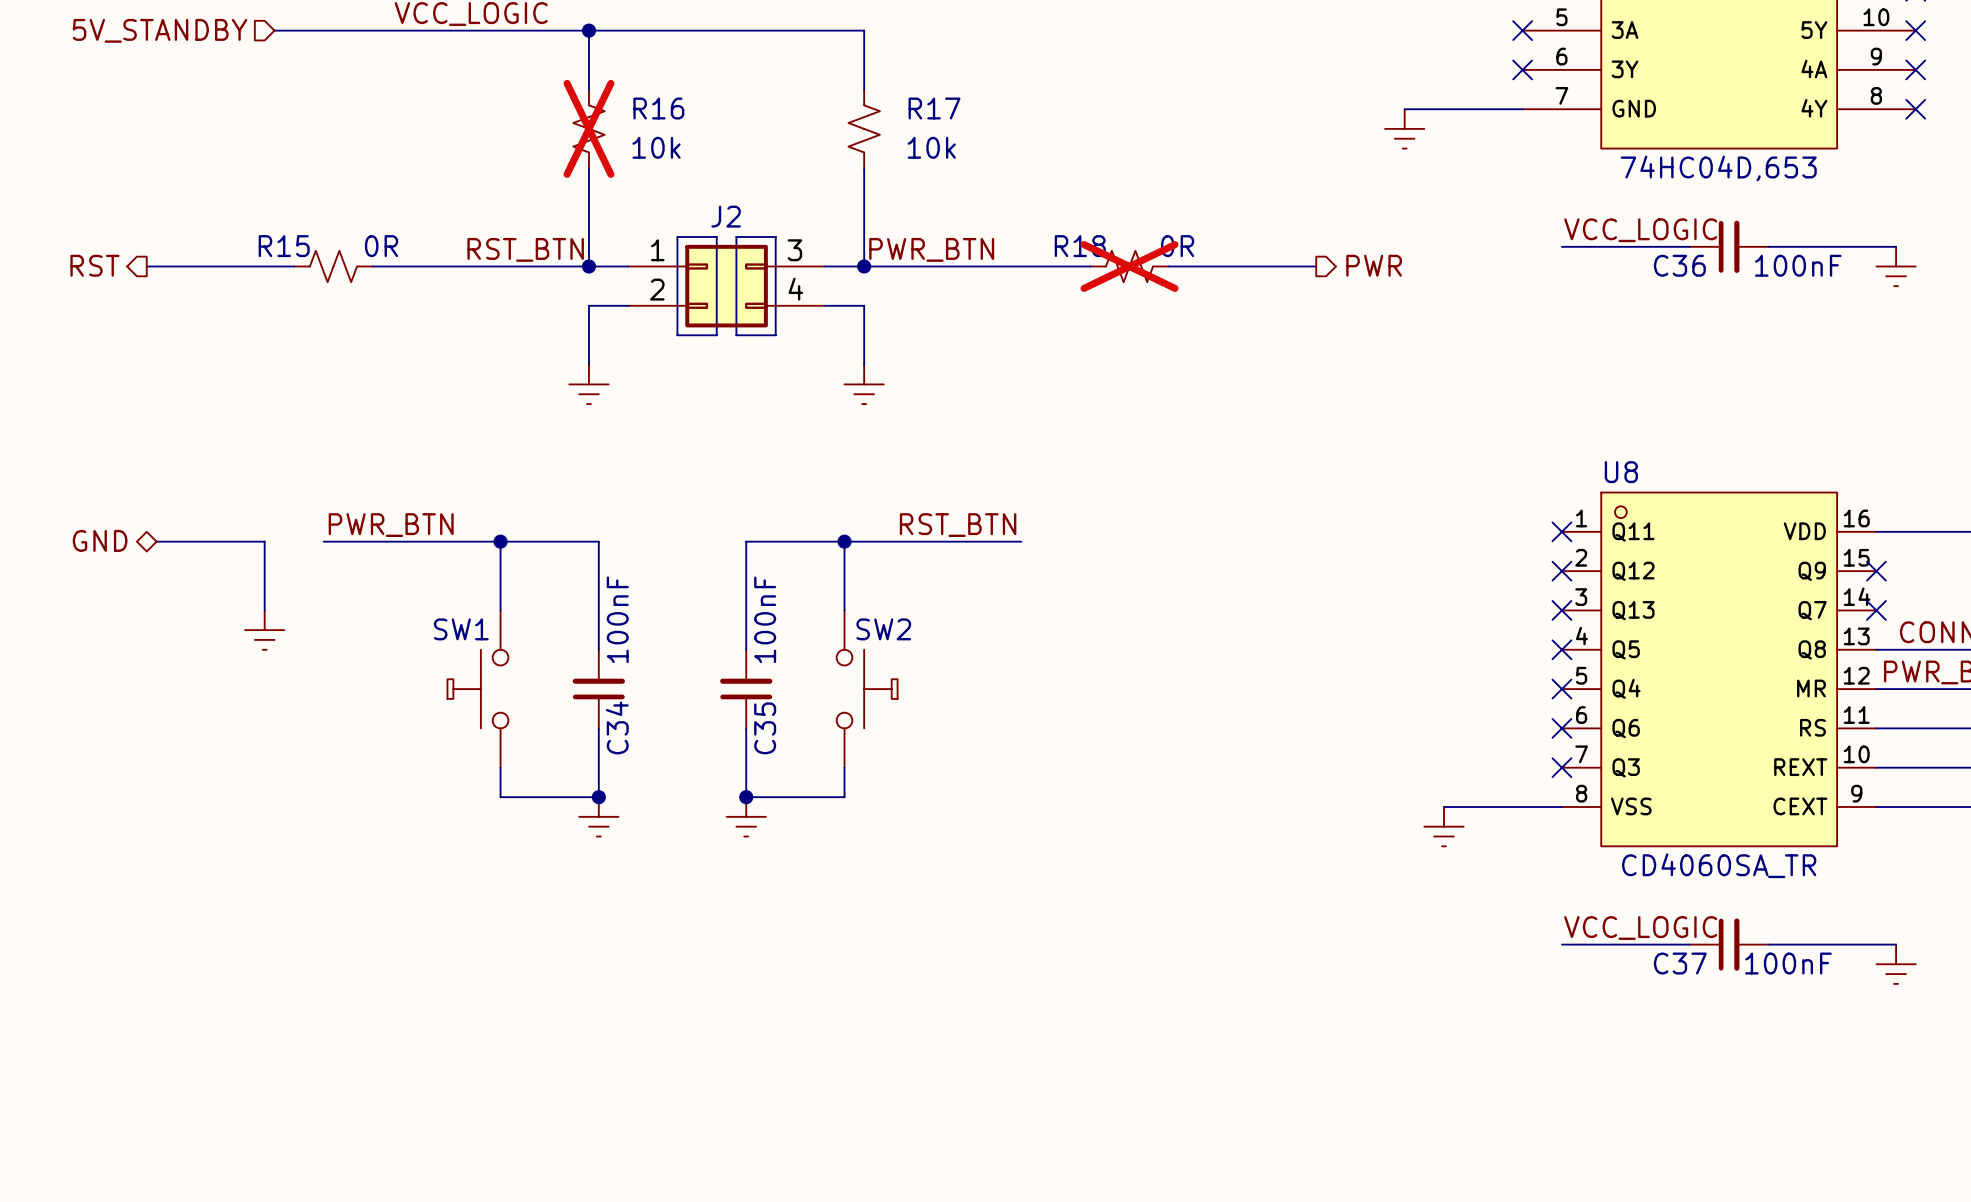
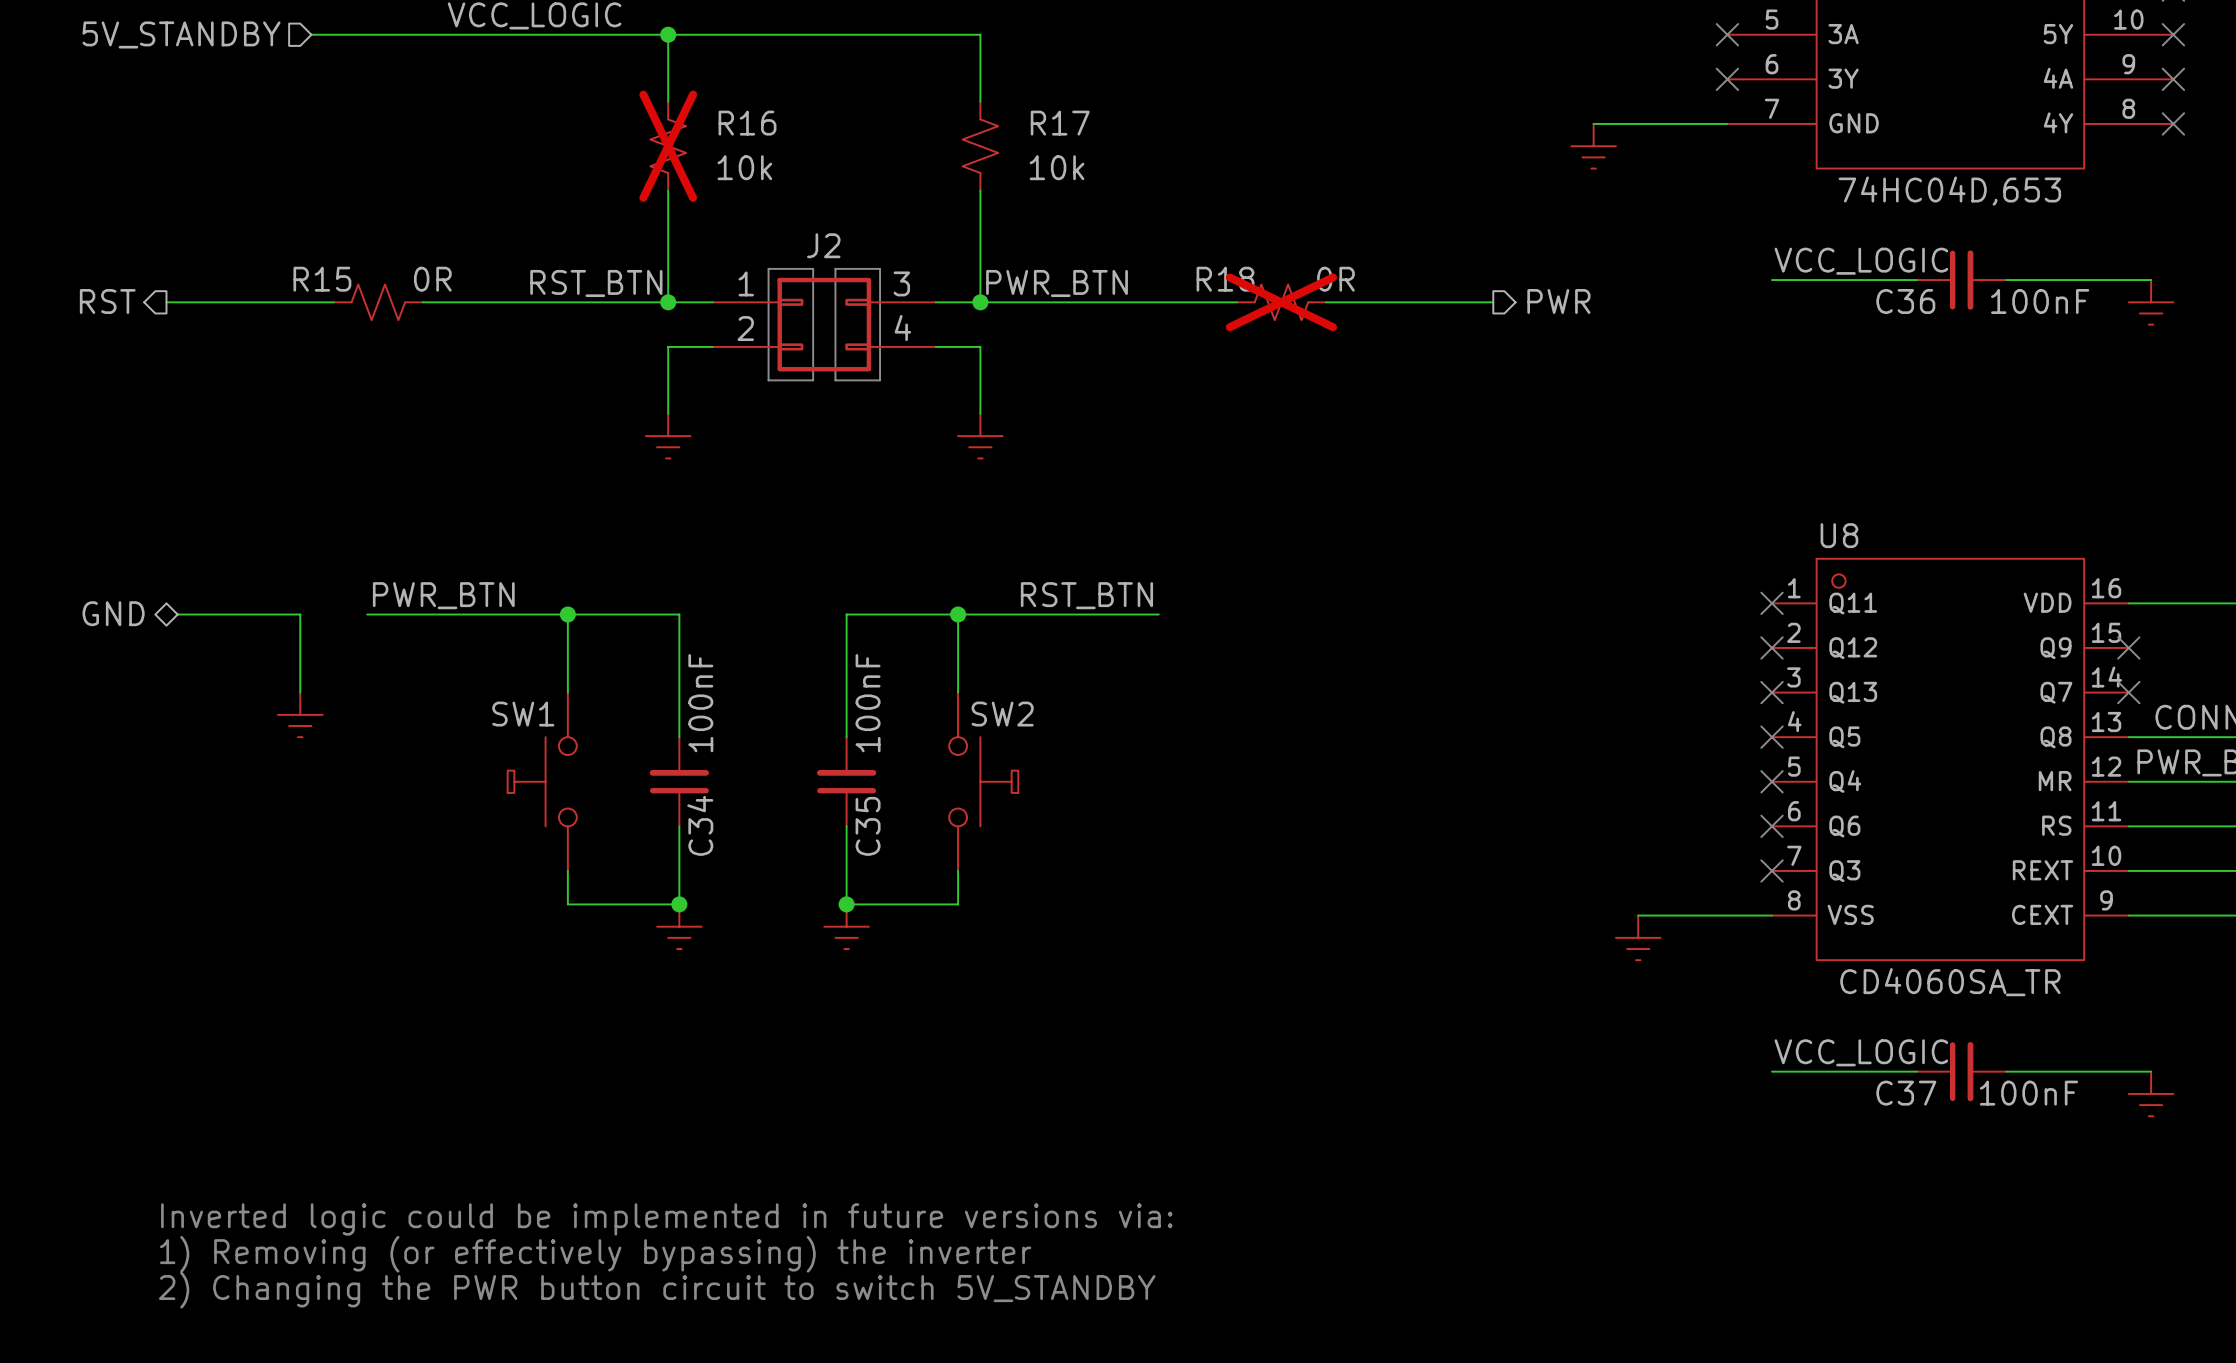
text: none -> Inverted logic could be implemented in future versions via: (666, 1219)
text: none -> 1) Removing (or effectively bypassing) the inverter (595, 1254)
text: none -> 2) Changing the PWR button circuit to switch 5V_STANDBY (657, 1290)

